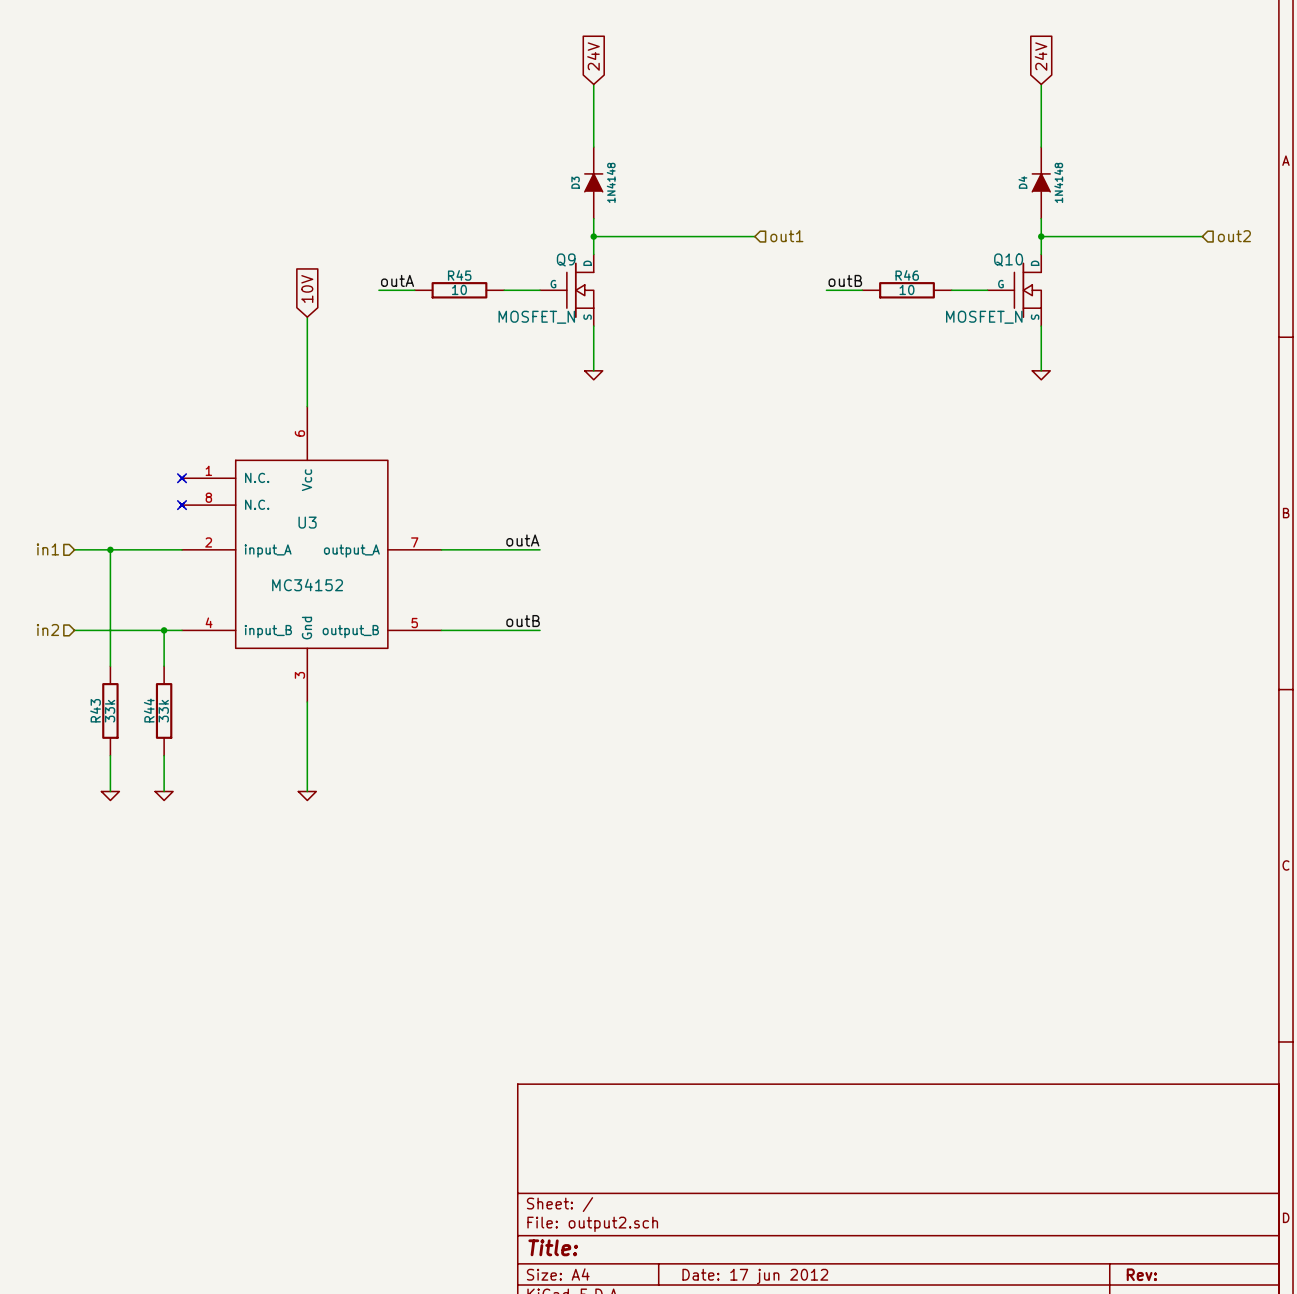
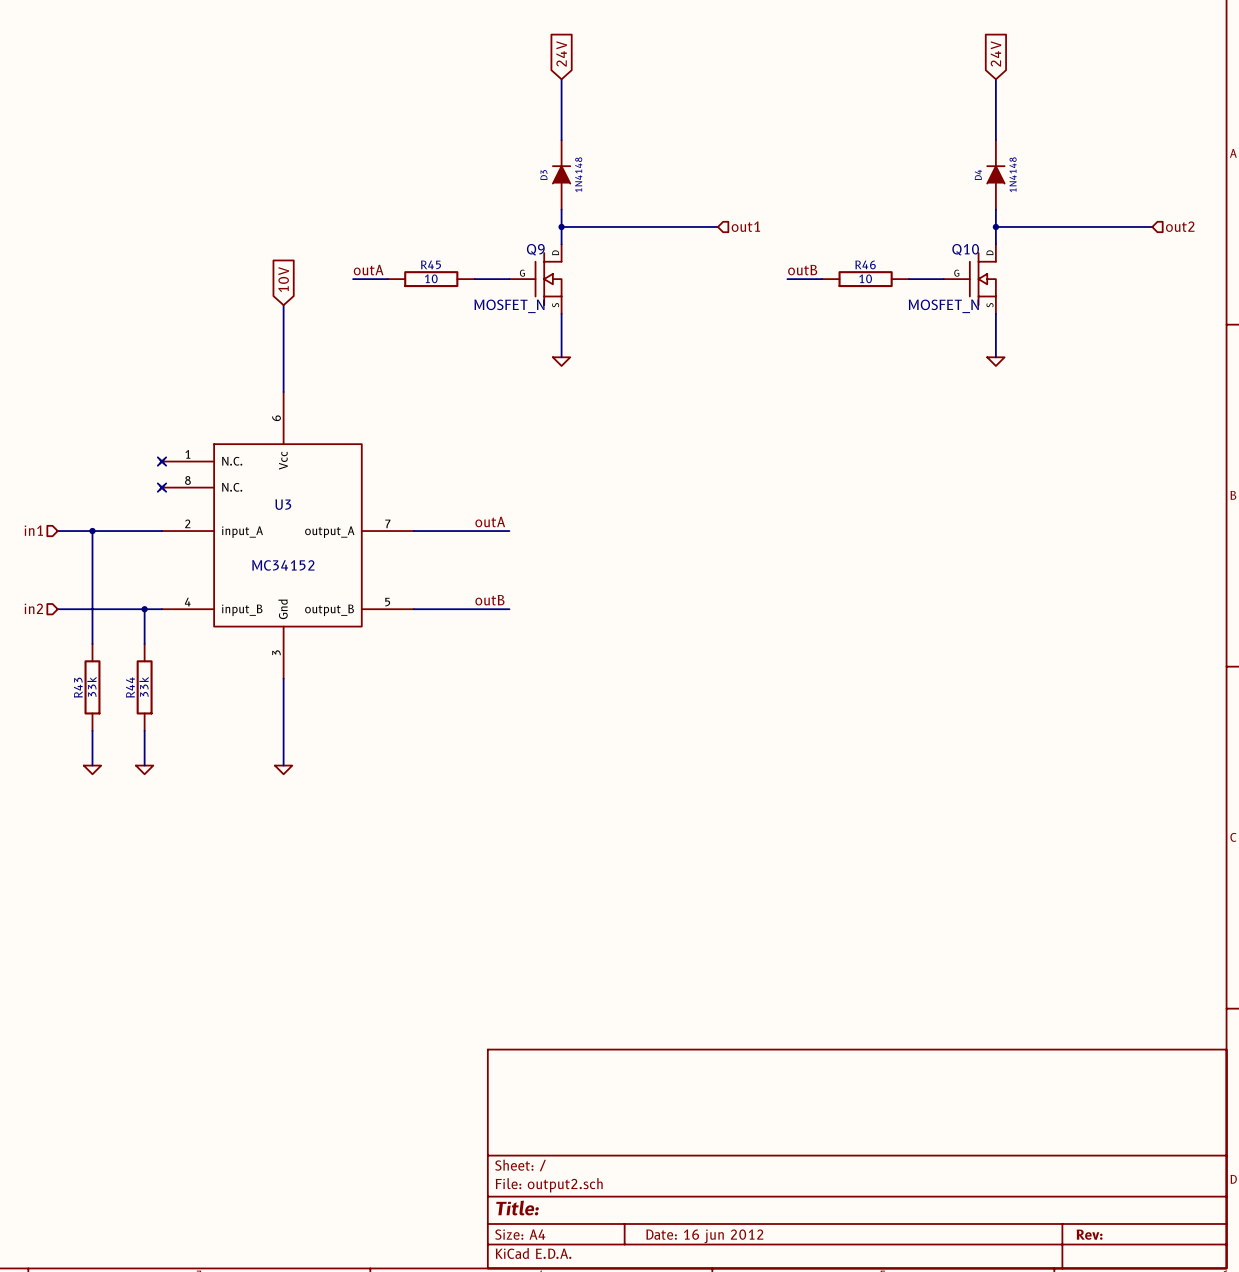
title block: Date: 17 jun 2012 (755, 1276) -> Date: 16 jun 2012 (704, 1236)

